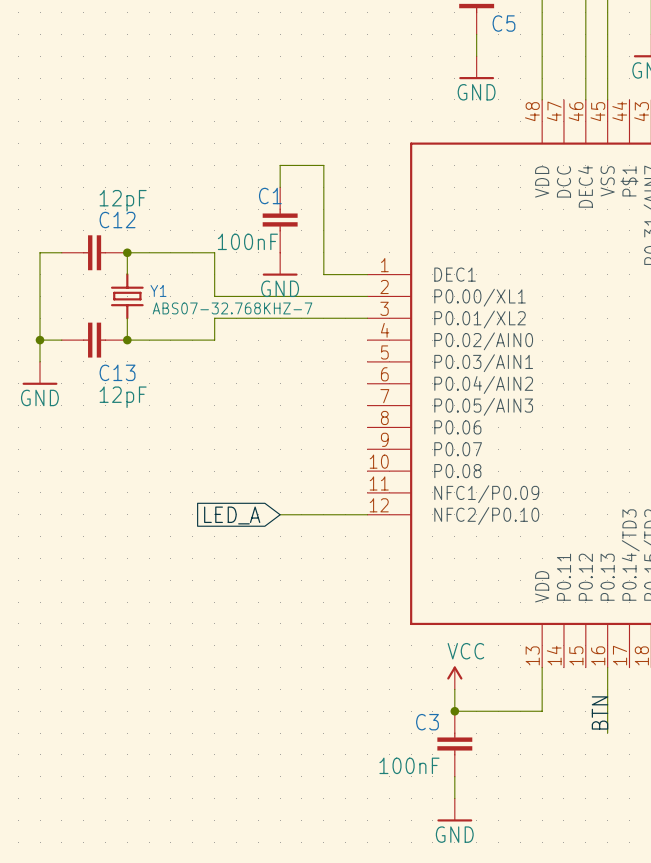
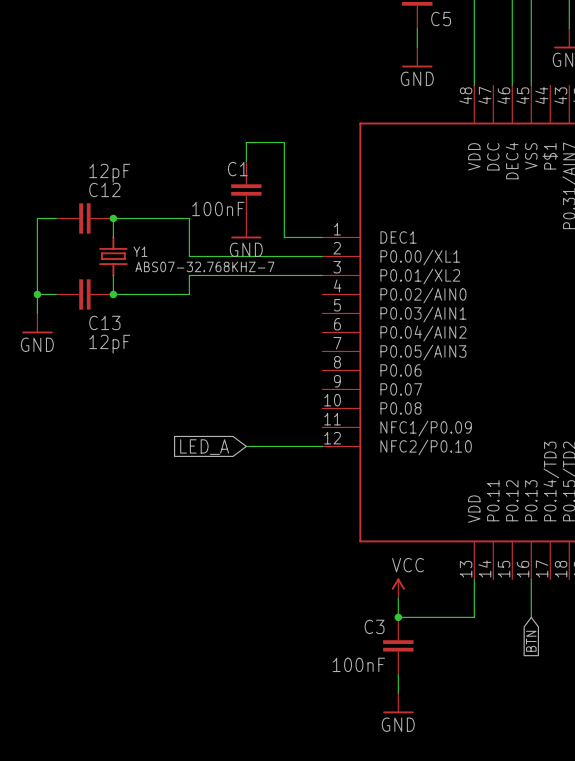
wire: (607, 711) (607, 733) -> none
label: BTN (600, 712) -> none
global label: none -> BTN (531, 641)

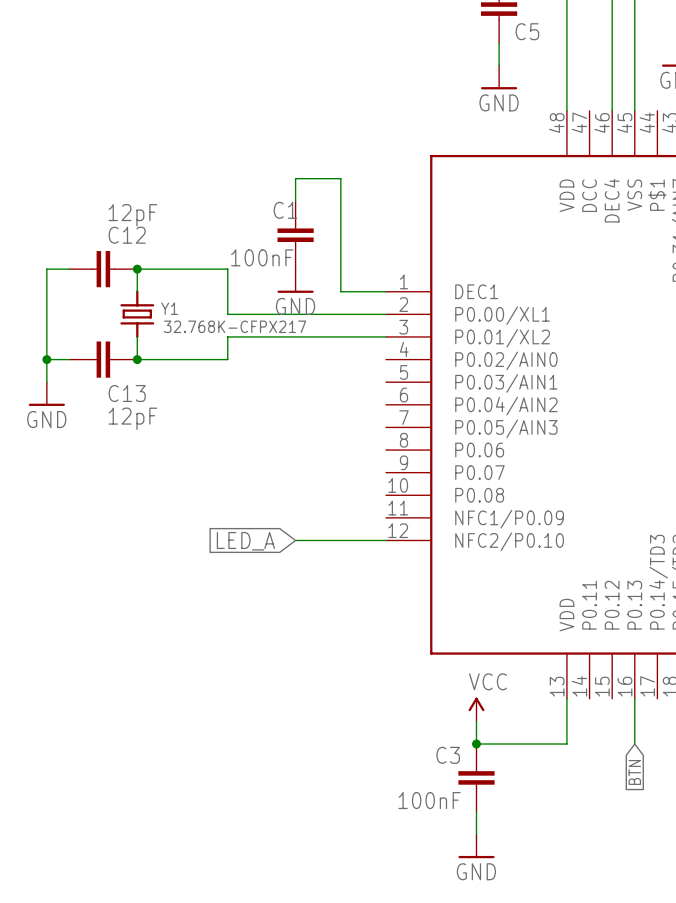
Y1 value: ABS07-32.768KHZ-7 (204, 266) -> 32.768K-CFPX217 (235, 326)

